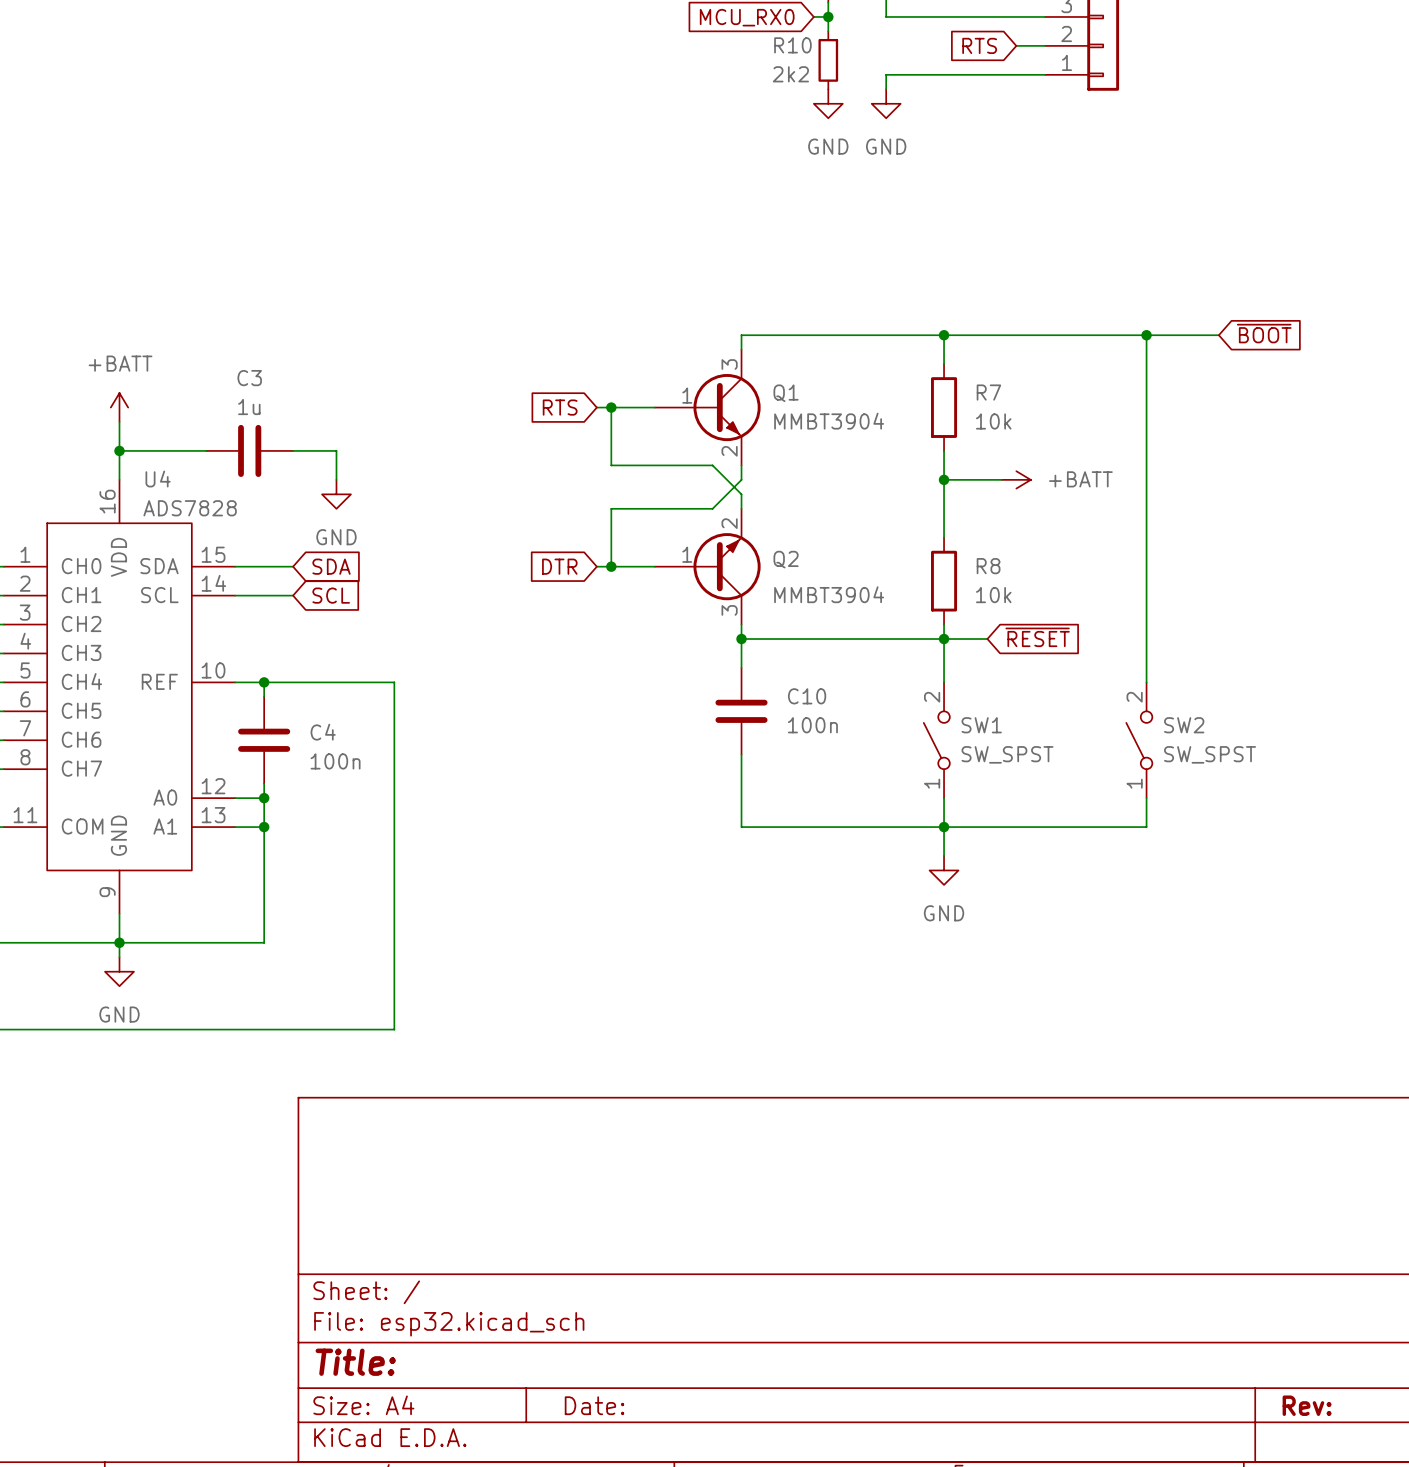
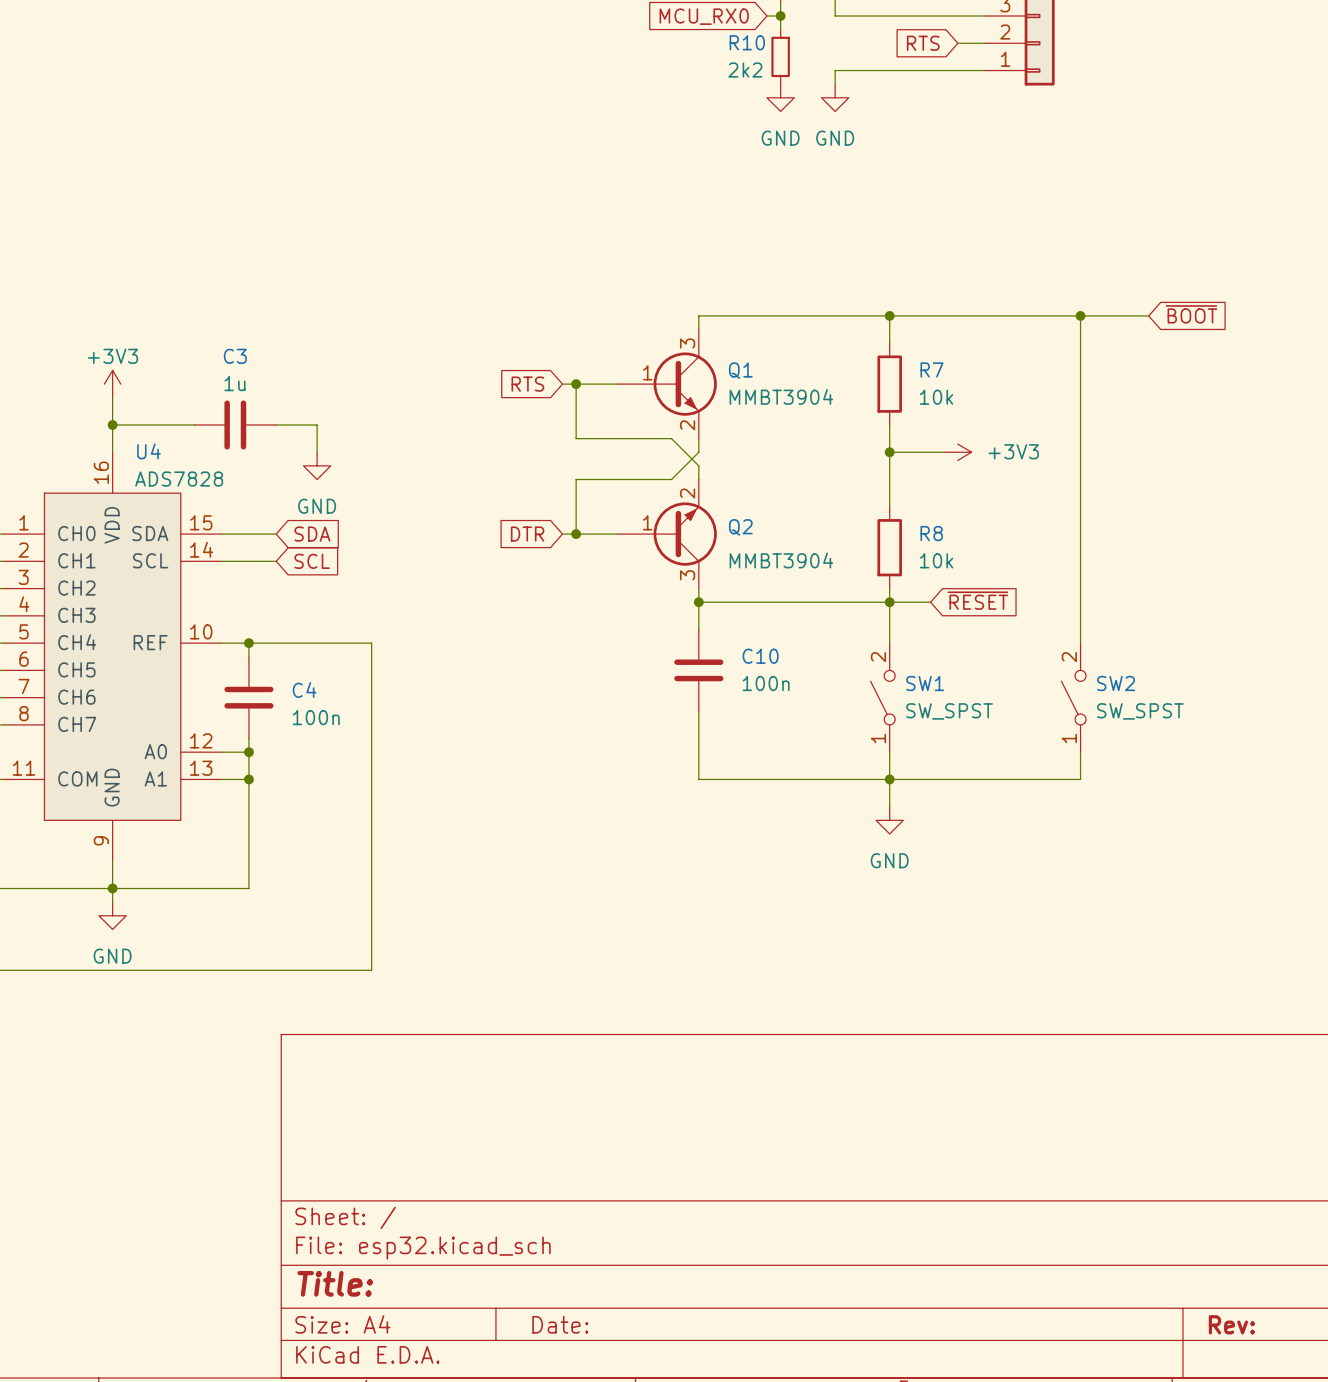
power symbol: +BATT (119, 407) -> +3V3 (112, 384)
power symbol: +BATT (1016, 479) -> +3V3 (957, 452)

